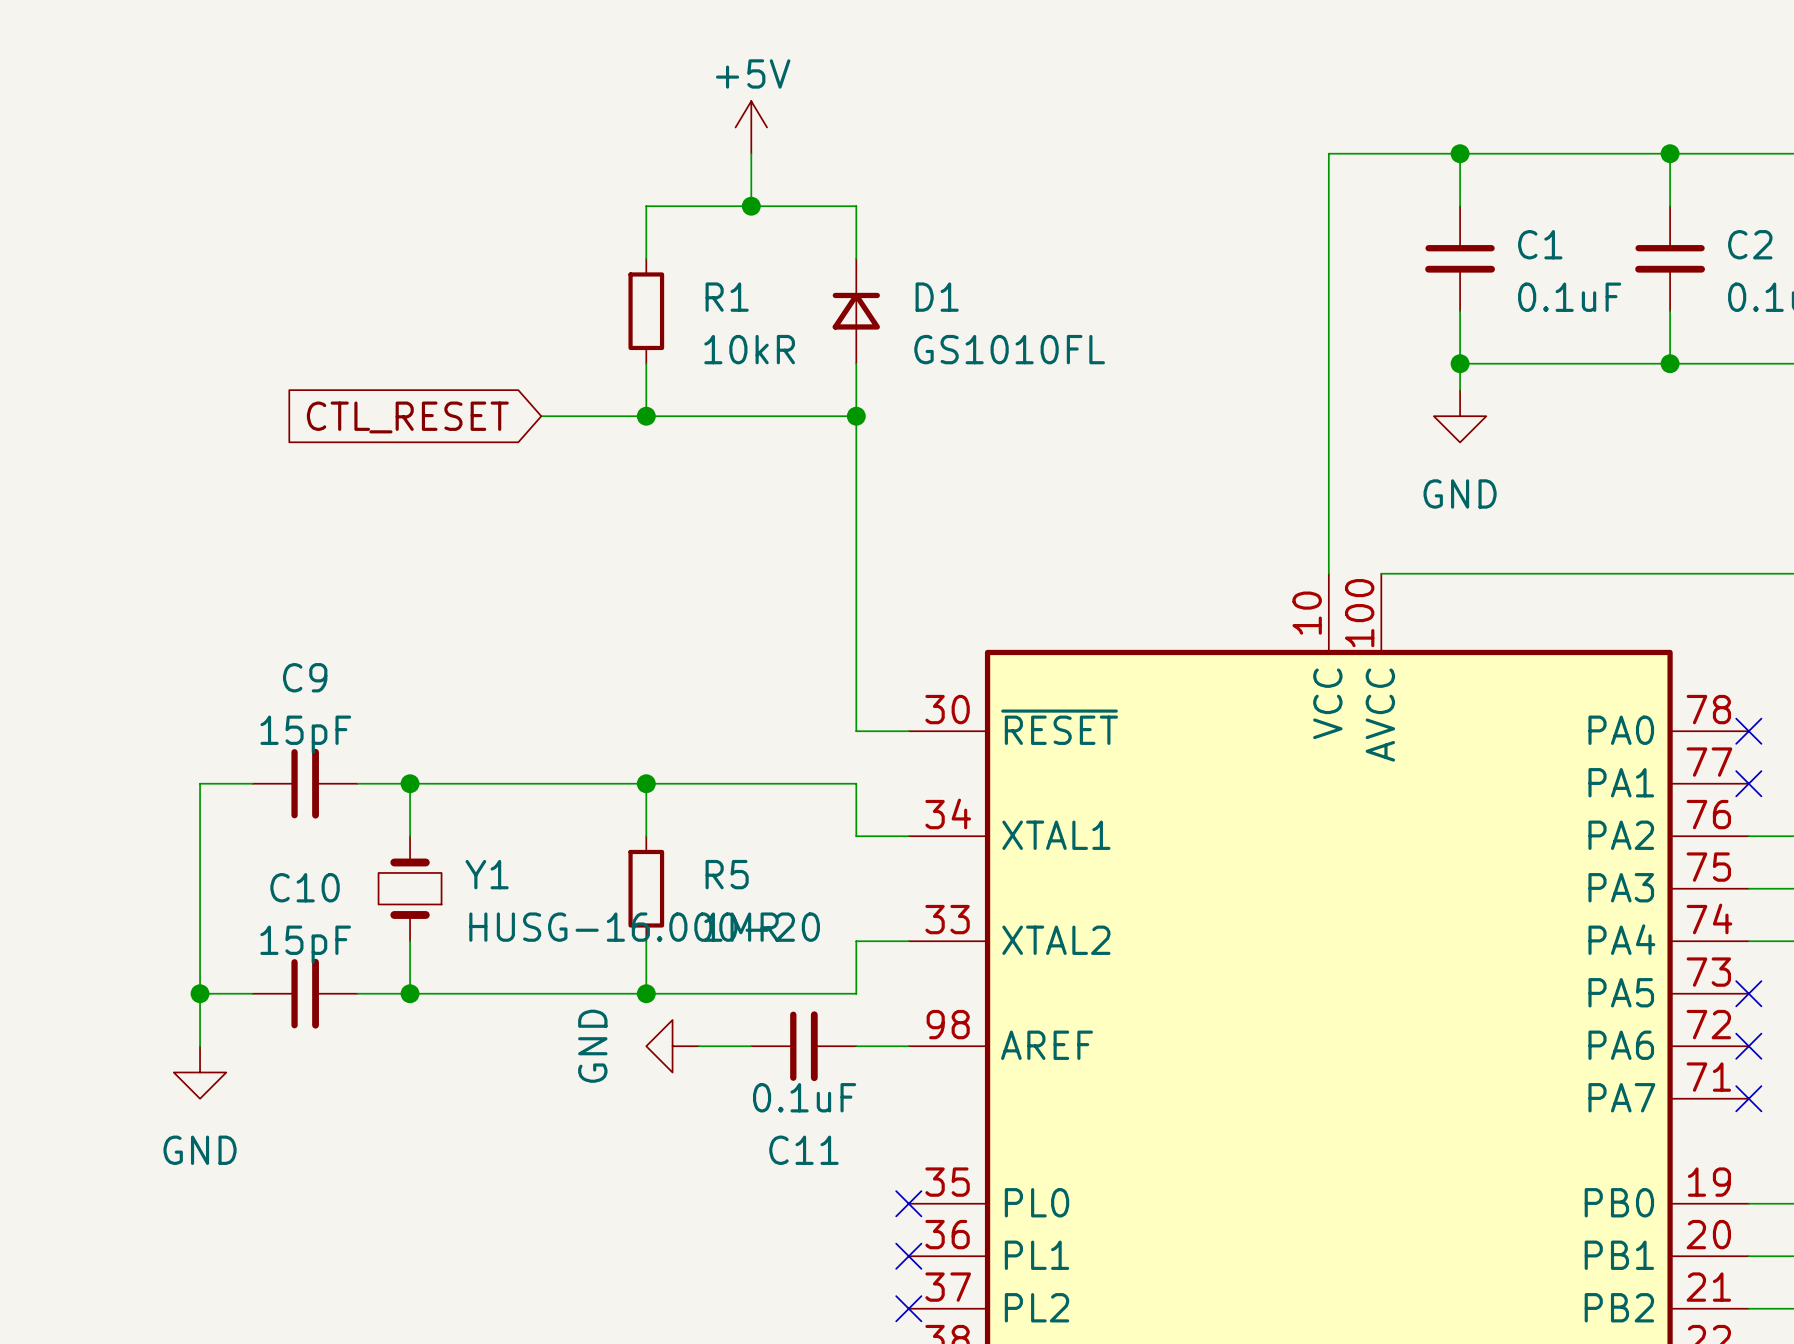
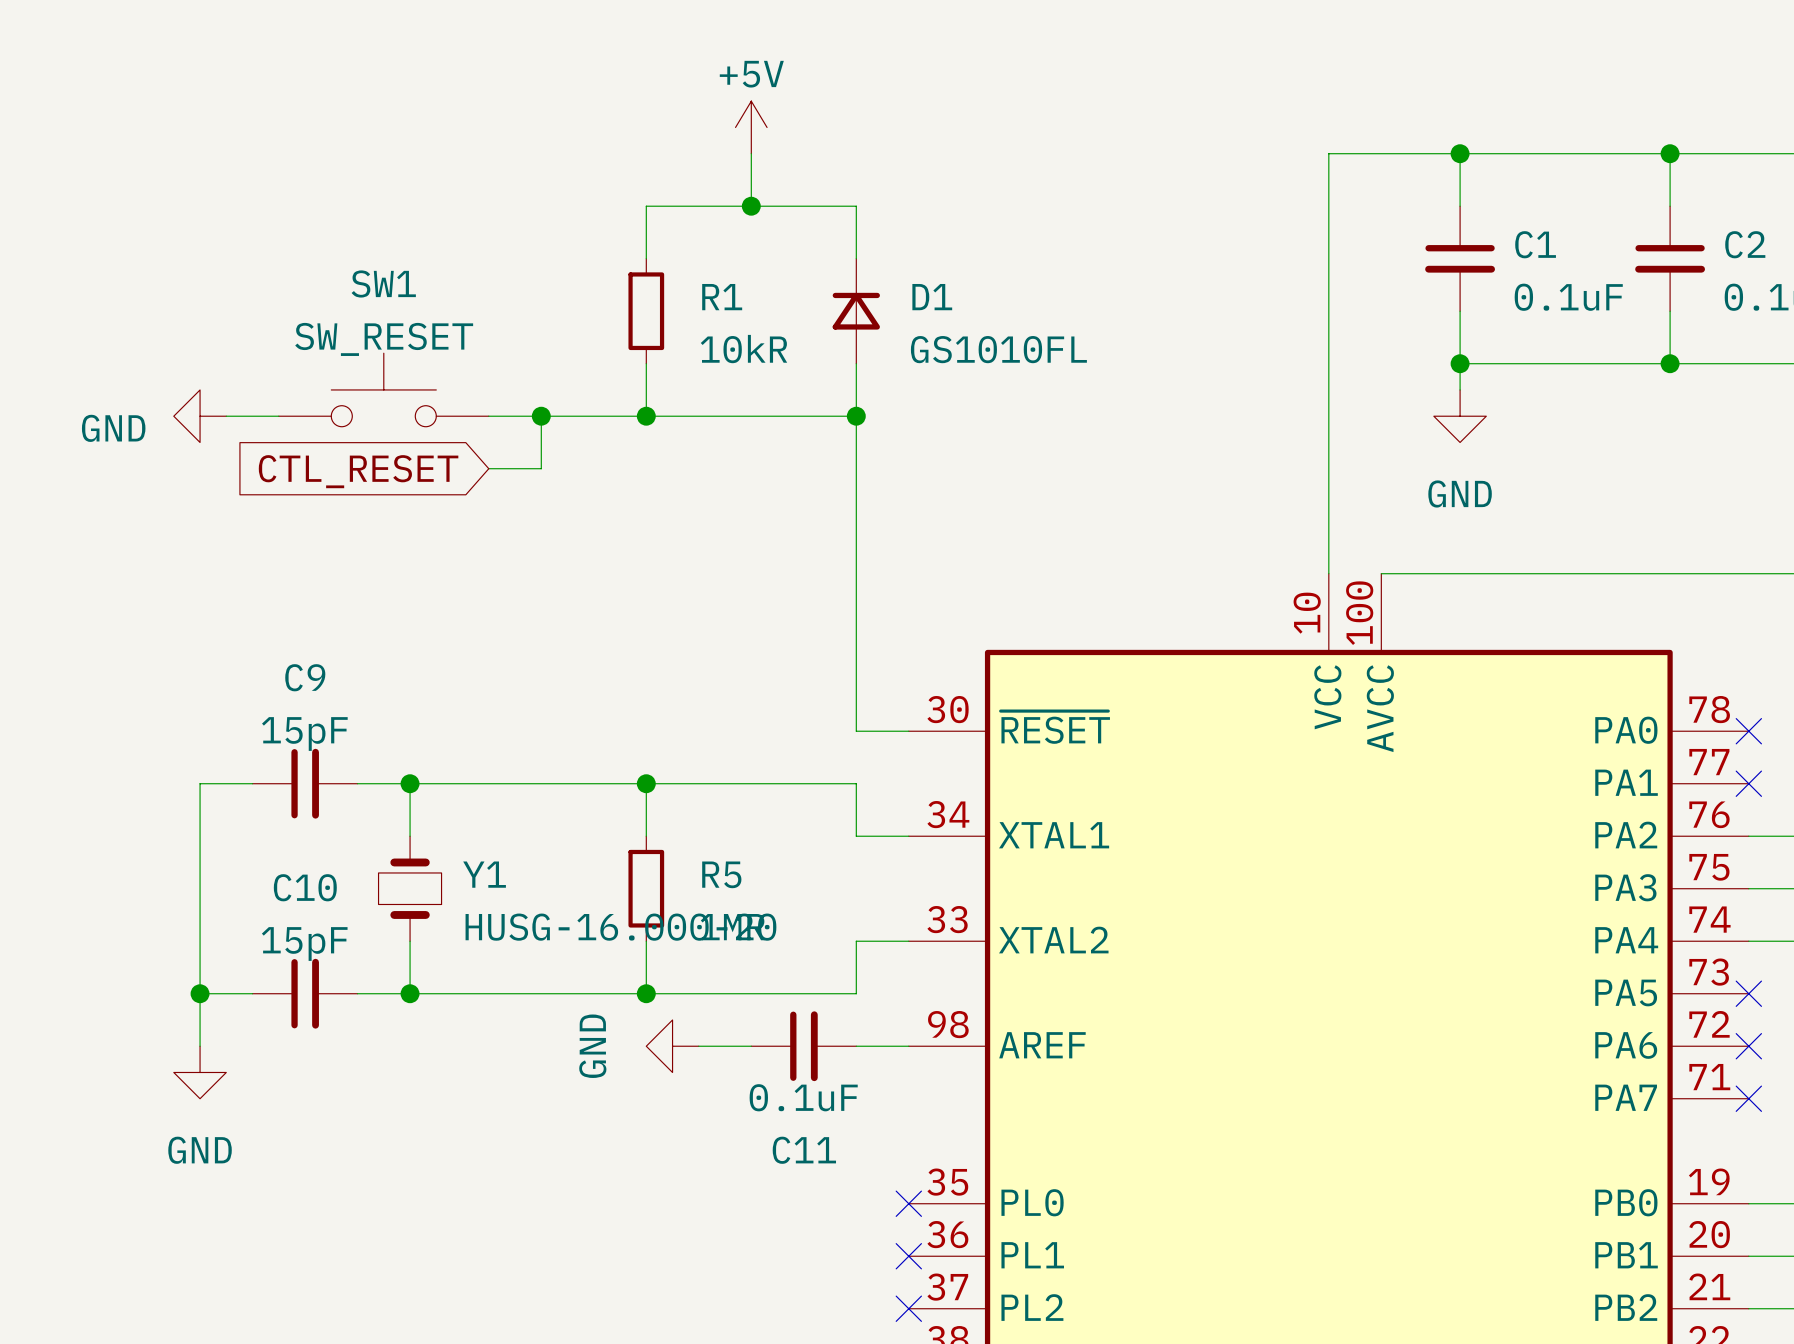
SW1: none -> SW_RESET (383, 389)
power symbol: none -> GND (200, 416)
wire: none -> (226, 416) (278, 416)
wire: none -> (488, 416) (541, 416) (541, 468) (488, 468)
junction: none -> (541, 416)
global label position: CTL_RESET (407, 417) -> CTL_RESET (358, 471)

